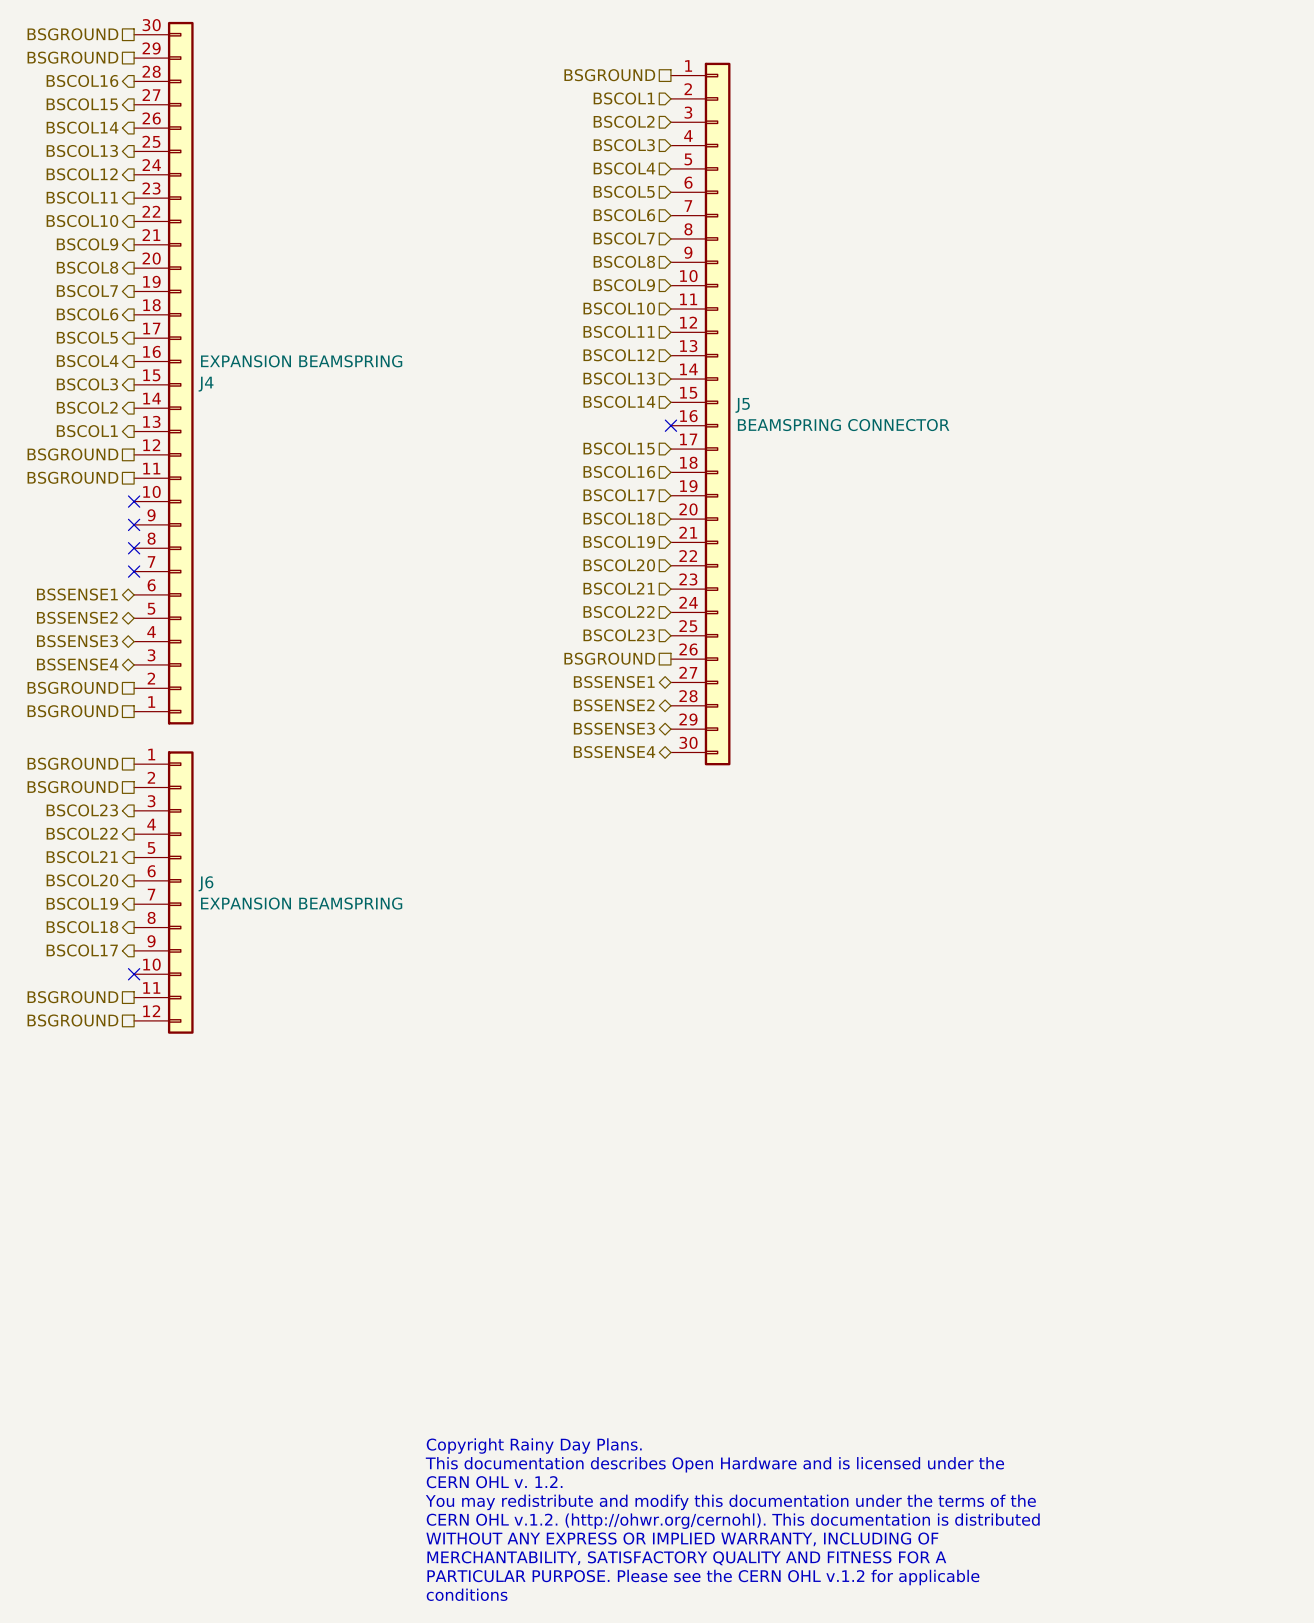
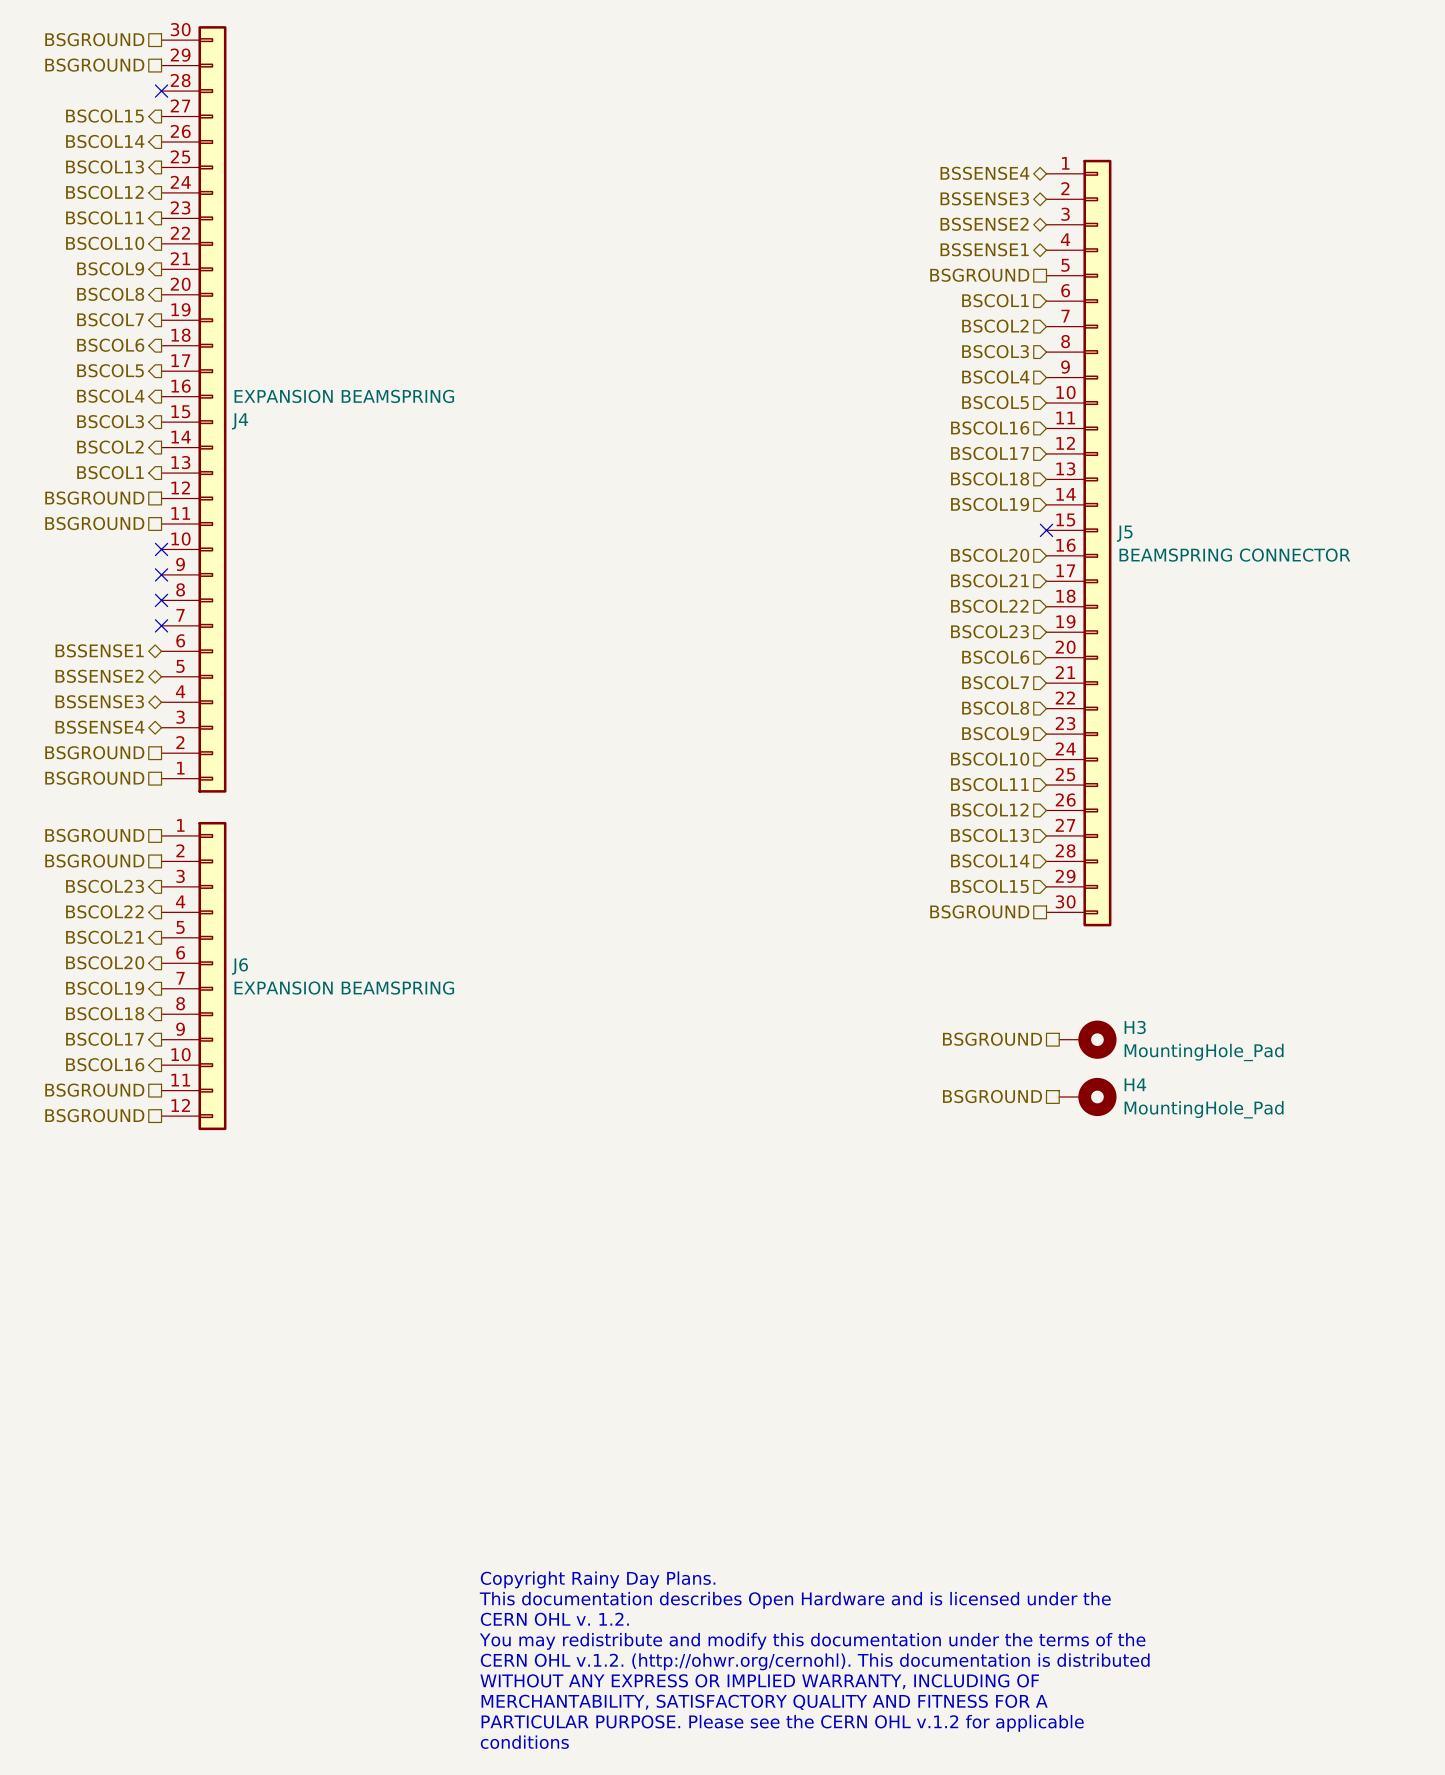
hierarchical label: BSGROUND (609, 75) -> none
hierarchical label: BSCOL16 (82, 80) -> none
no-connect mark: none -> (161, 91)
hierarchical label: BSCOL1 (624, 98) -> none
hierarchical label: BSCOL2 (624, 121) -> none
hierarchical label: BSCOL3 (624, 145) -> none
hierarchical label: none -> BSSENSE4 (984, 173)
hierarchical label: BSCOL4 (624, 168) -> none
hierarchical label: none -> BSSENSE3 (984, 198)
hierarchical label: BSCOL5 (624, 191) -> none
hierarchical label: none -> BSSENSE2 (984, 224)
hierarchical label: BSCOL6 (624, 215) -> none
hierarchical label: none -> BSSENSE1 (984, 249)
hierarchical label: BSCOL7 (624, 238) -> none
hierarchical label: none -> BSGROUND (979, 275)
hierarchical label: BSCOL8 (624, 261) -> none
hierarchical label: none -> BSCOL1 (995, 300)
hierarchical label: BSCOL9 (624, 285) -> none
hierarchical label: none -> BSCOL2 (995, 326)
hierarchical label: BSCOL10 (619, 308) -> none
hierarchical label: none -> BSCOL3 (995, 351)
hierarchical label: BSCOL11 (619, 331) -> none
hierarchical label: none -> BSCOL4 (995, 377)
hierarchical label: BSCOL12 (619, 355) -> none
hierarchical label: none -> BSCOL5 (995, 402)
hierarchical label: BSCOL13 (619, 378) -> none
hierarchical label: none -> BSCOL16 (990, 428)
hierarchical label: BSCOL14 (619, 401) -> none
hierarchical label: none -> BSCOL17 (989, 453)
J5 position: (700, 414) -> (1078, 543)
no-connect mark: (670, 425) -> none
hierarchical label: none -> BSCOL18 (990, 478)
hierarchical label: BSCOL15 (619, 448) -> none
hierarchical label: none -> BSCOL19 (990, 504)
hierarchical label: BSCOL16 (619, 471) -> none
no-connect mark: none -> (1046, 530)
hierarchical label: BSCOL17 (619, 495) -> none
hierarchical label: none -> BSCOL20 (990, 555)
hierarchical label: BSCOL18 (619, 518) -> none
hierarchical label: none -> BSCOL21 (989, 580)
hierarchical label: BSCOL19 (619, 541) -> none
hierarchical label: none -> BSCOL22 (989, 606)
hierarchical label: BSCOL20 (619, 565) -> none
hierarchical label: none -> BSCOL23 (990, 631)
hierarchical label: BSCOL21 (619, 588) -> none
hierarchical label: none -> BSCOL6 (995, 657)
hierarchical label: BSCOL22 (619, 612) -> none
hierarchical label: none -> BSCOL7 (995, 682)
hierarchical label: BSCOL23 (619, 635) -> none
hierarchical label: none -> BSCOL8 (995, 708)
hierarchical label: BSGROUND (609, 658) -> none
hierarchical label: none -> BSCOL9 (995, 733)
hierarchical label: BSSENSE1 (614, 682) -> none
hierarchical label: none -> BSCOL10 (990, 759)
hierarchical label: BSSENSE2 (614, 705) -> none
hierarchical label: none -> BSCOL11 (989, 784)
hierarchical label: BSSENSE3 (614, 728) -> none
hierarchical label: none -> BSCOL12 (989, 810)
hierarchical label: BSSENSE4 (614, 752) -> none
hierarchical label: none -> BSCOL13 (990, 835)
hierarchical label: none -> BSCOL14 (990, 860)
hierarchical label: none -> BSCOL15 (989, 886)
hierarchical label: none -> BSGROUND (979, 911)
hierarchical label: none -> BSGROUND (992, 1039)
H3: none -> MountingHole_Pad (1087, 1039)
hierarchical label: none -> BSCOL16 (105, 1064)
no-connect mark: (134, 974) -> none
hierarchical label: none -> BSGROUND (992, 1096)
H4: none -> MountingHole_Pad (1087, 1096)

